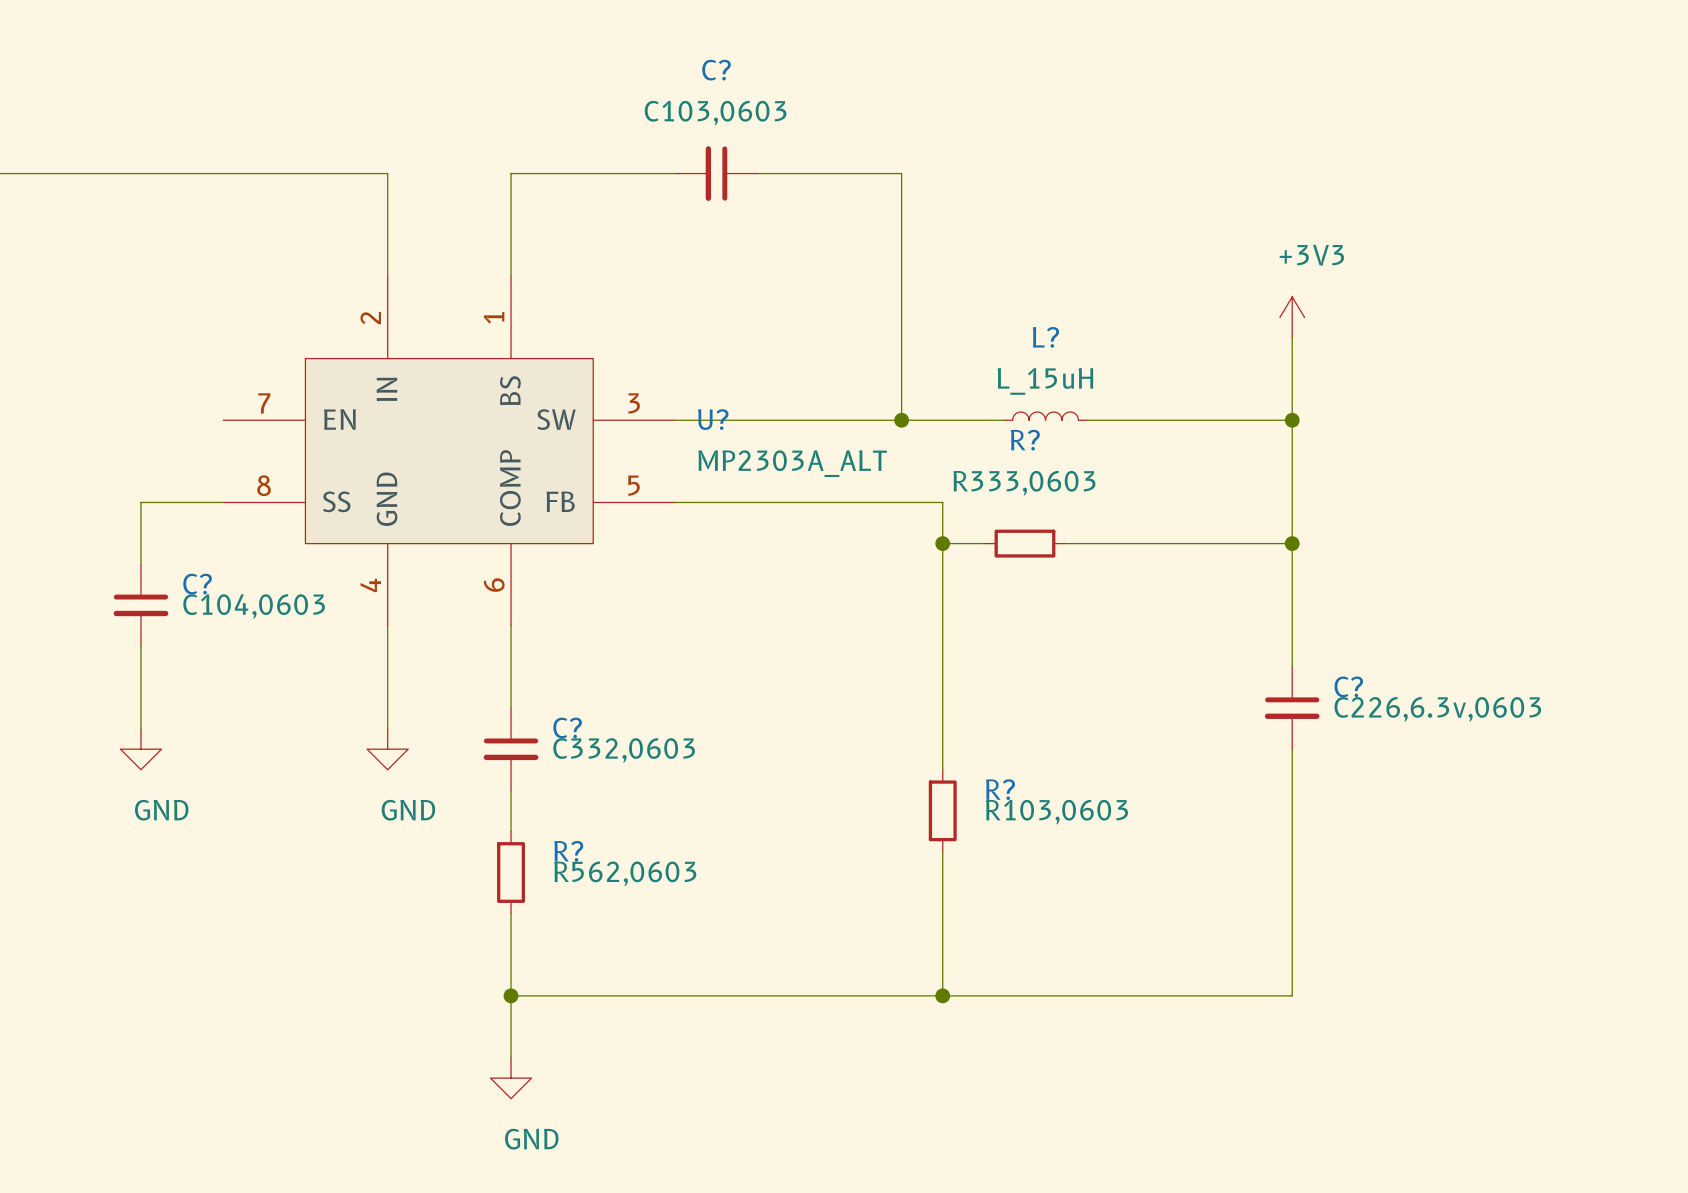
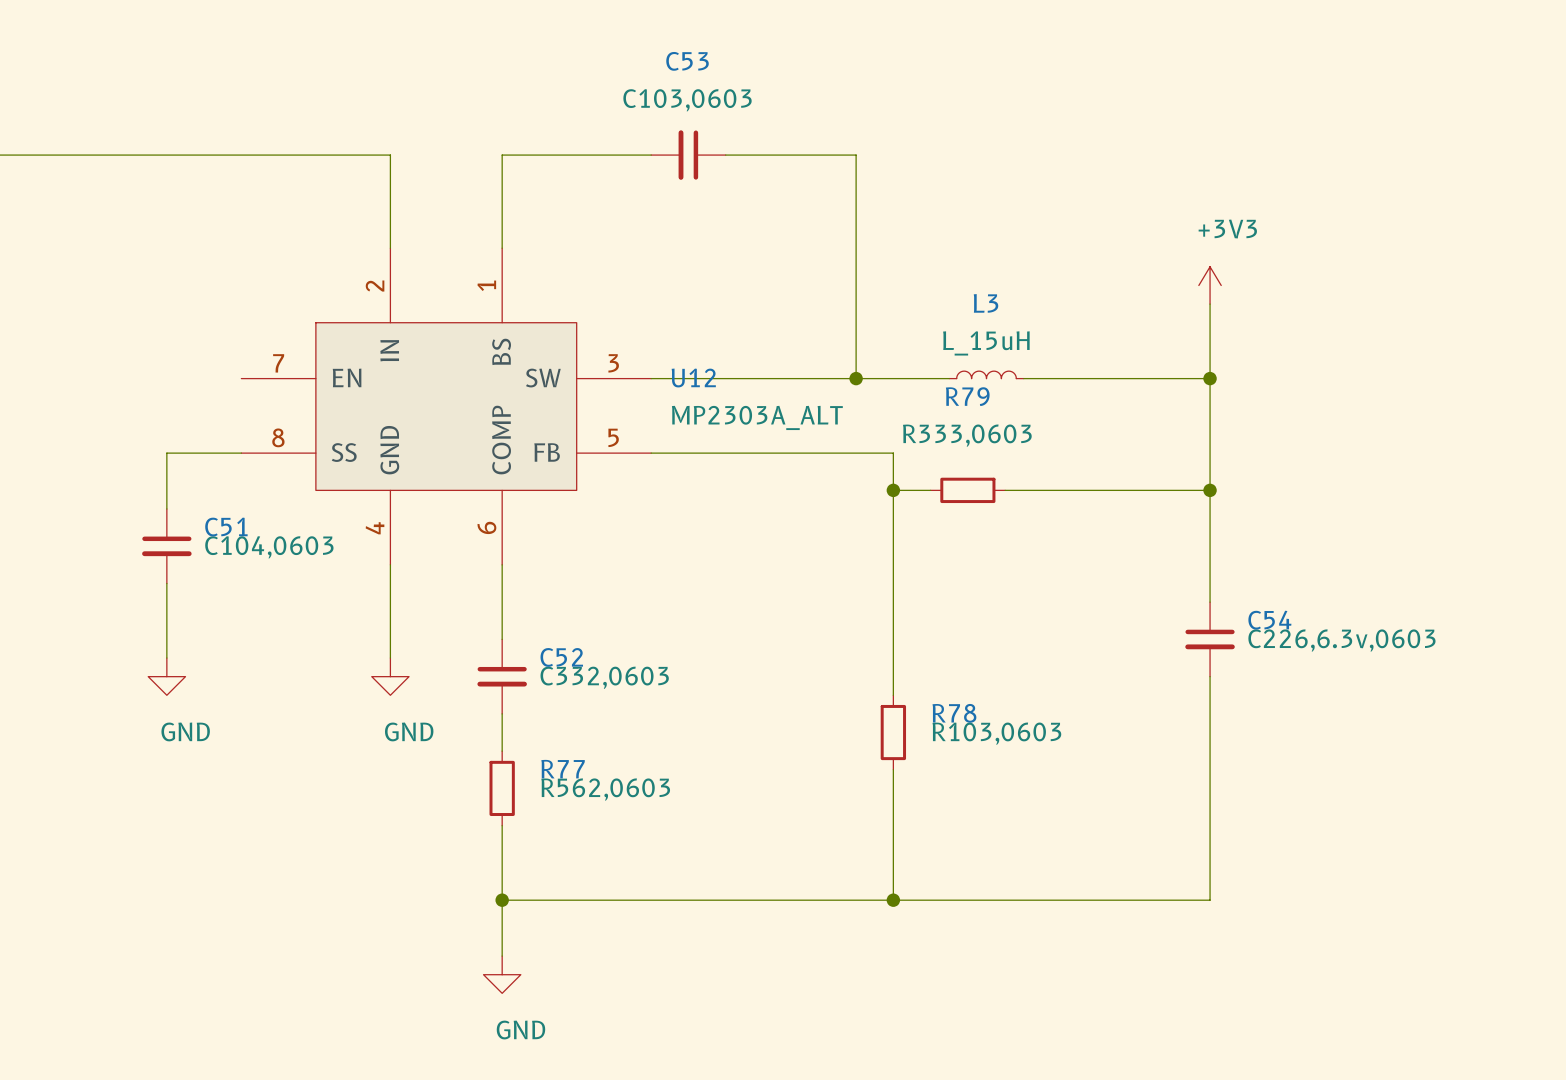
C? name: C? (716, 70) -> C53 (687, 61)
L? name: L? (1045, 337) -> L3 (986, 303)
U? name: U? (713, 419) -> U12 (693, 378)
R? name: R? (1025, 440) -> R79 (967, 396)
C? name: C? (197, 584) -> C51 (226, 527)
C? name: C? (1348, 686) -> C54 (1269, 620)
C? name: C? (567, 727) -> C52 (561, 657)
R? name: R? (1000, 789) -> R78 (954, 713)
R? name: R? (568, 851) -> R77 (563, 769)

